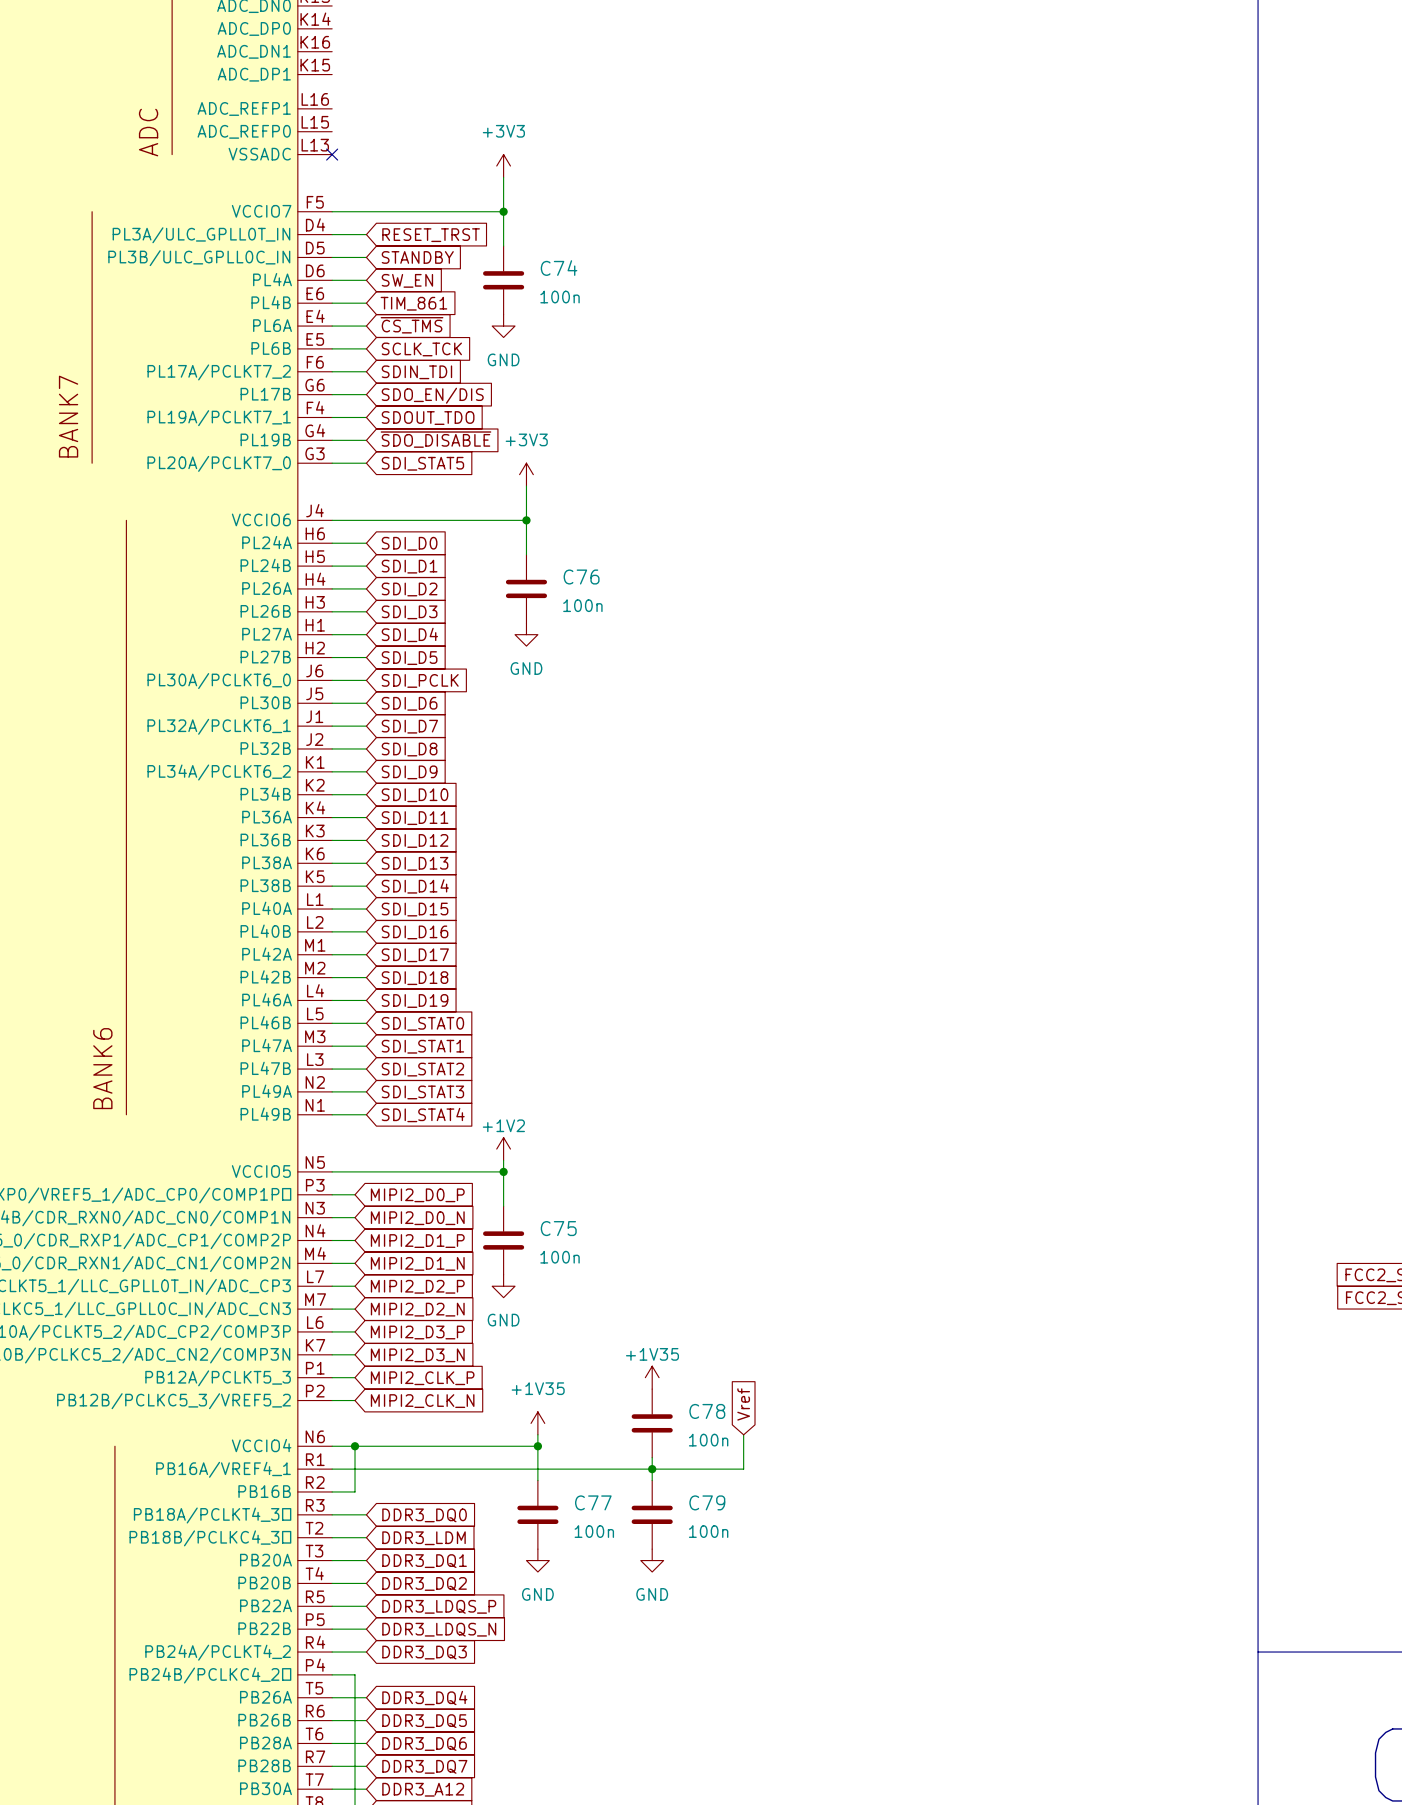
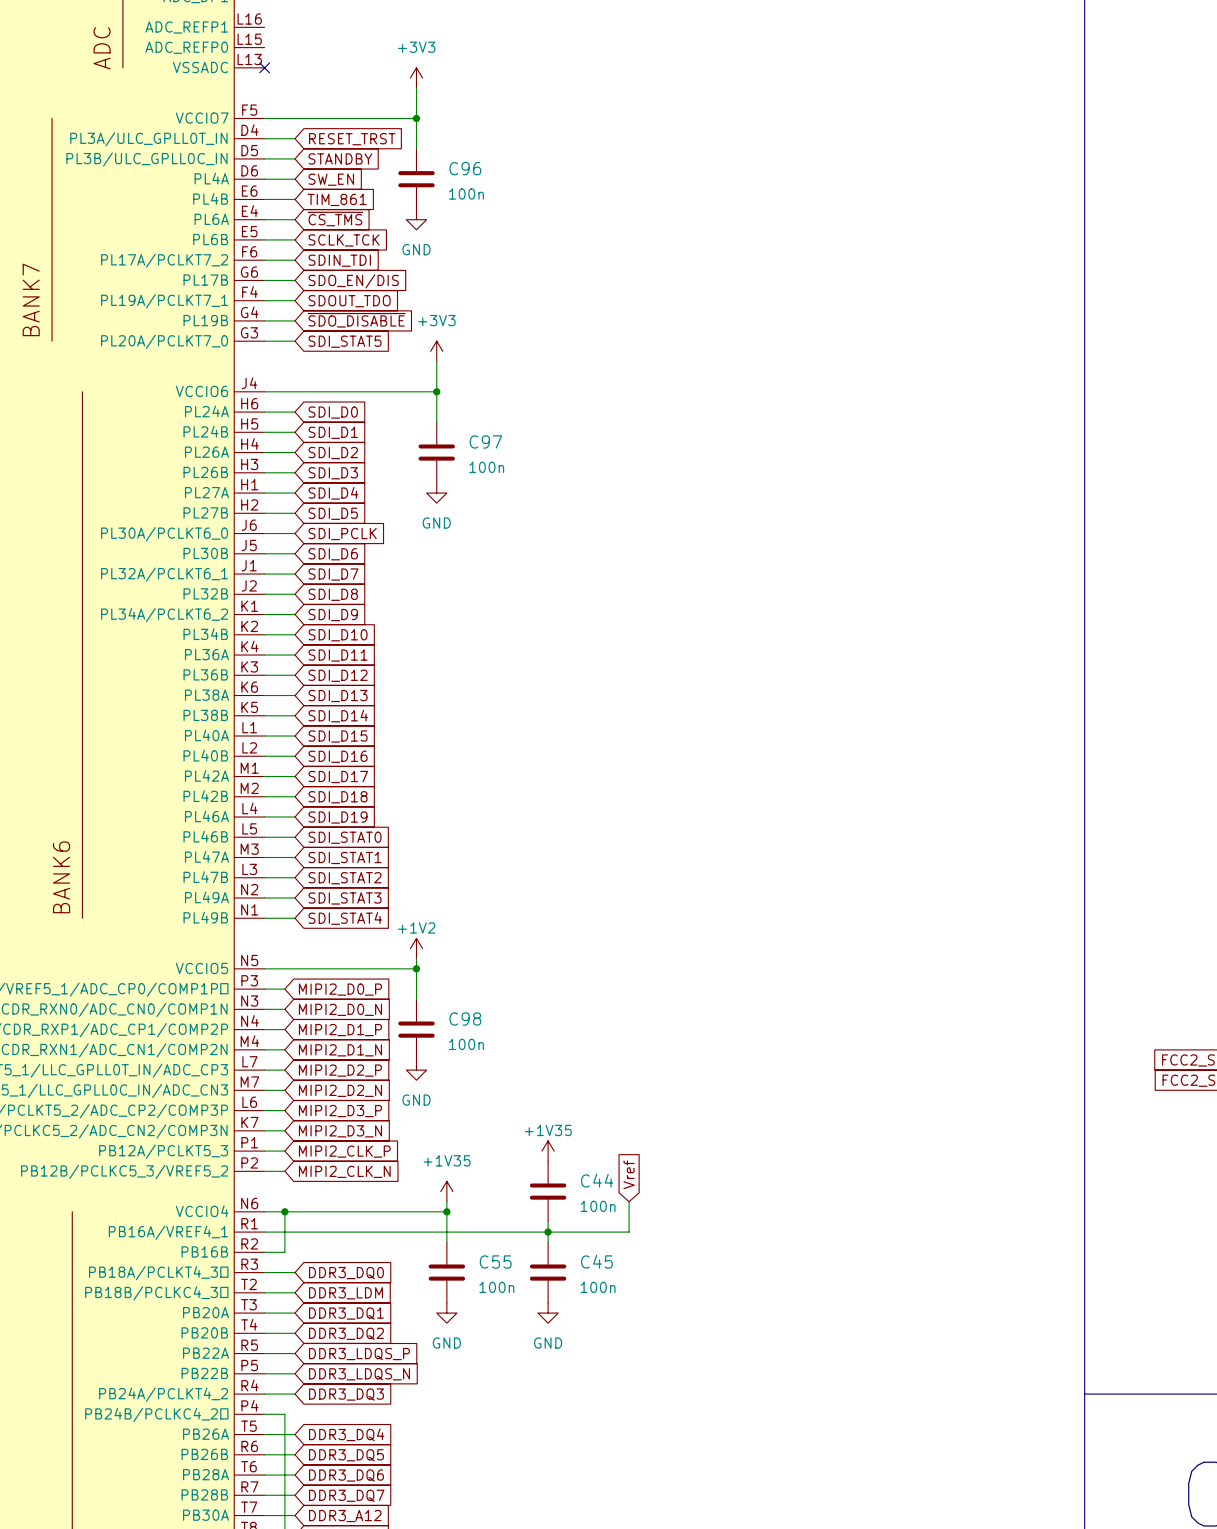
C74 name: C74 (559, 268) -> C96 (465, 168)
C76 name: C76 (581, 577) -> C97 (485, 441)
C75 name: C75 (558, 1228) -> C98 (465, 1019)
C78 name: C78 (707, 1411) -> C44 (597, 1180)
C77 name: C77 (593, 1502) -> C55 (495, 1261)
C79 name: C79 (707, 1502) -> C45 (596, 1261)

